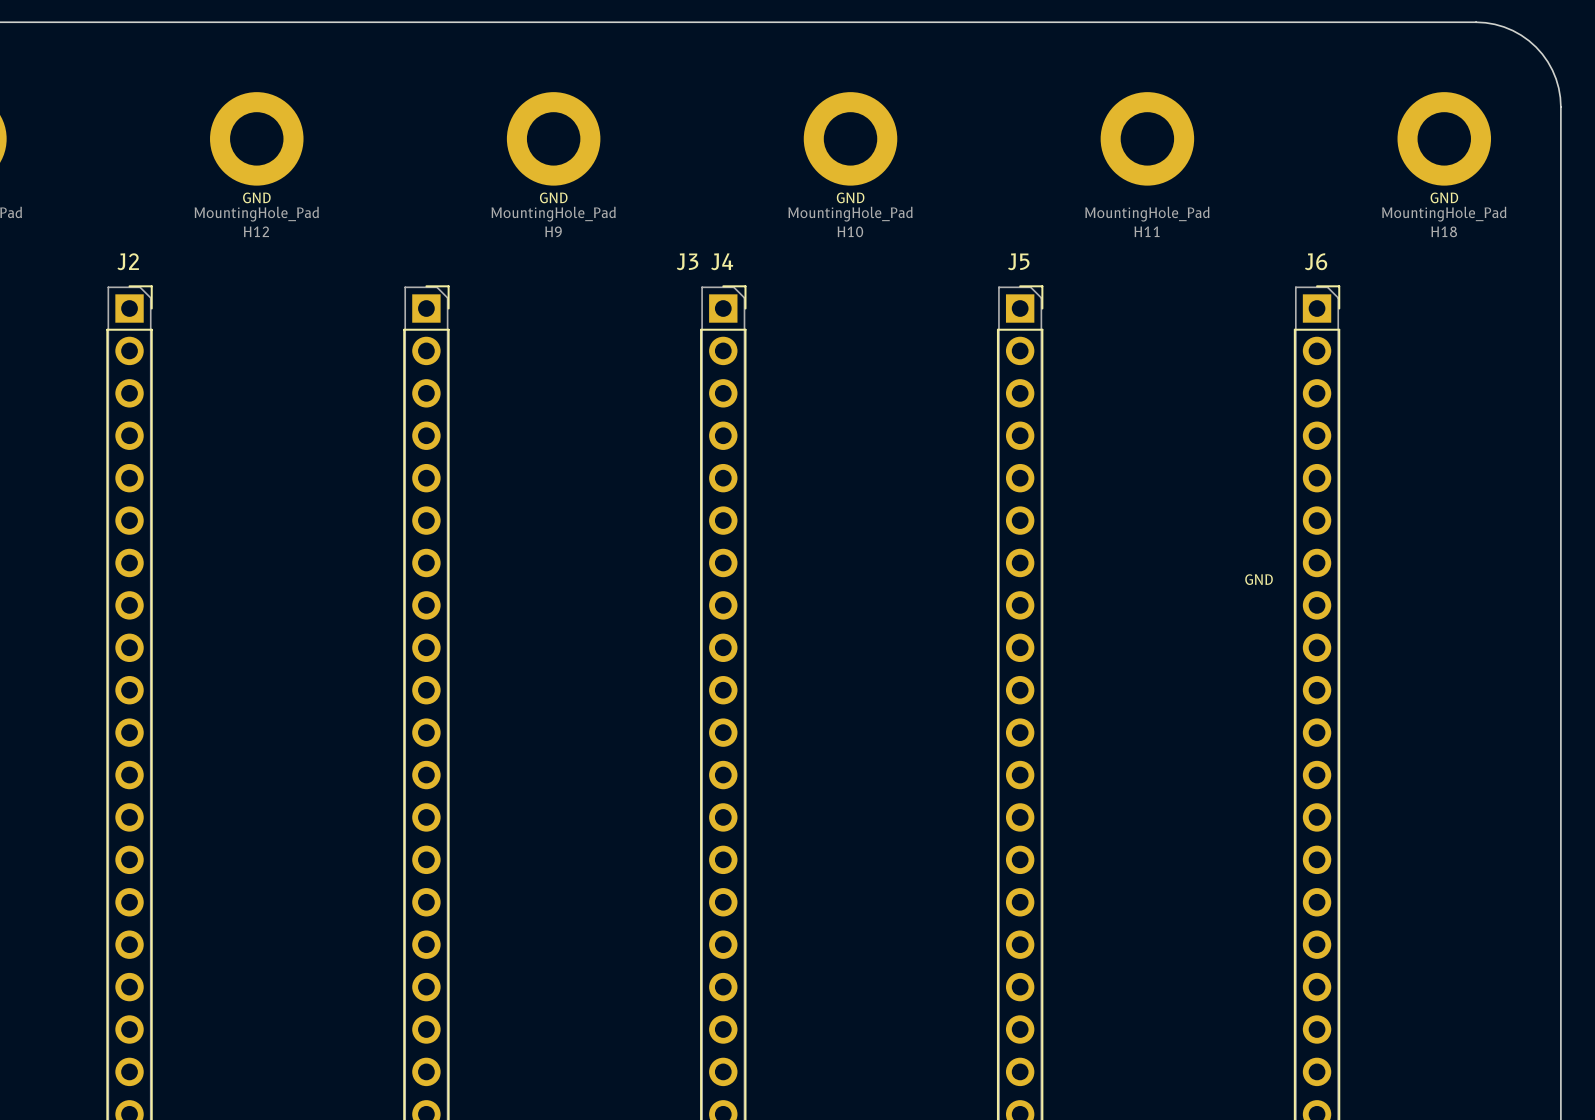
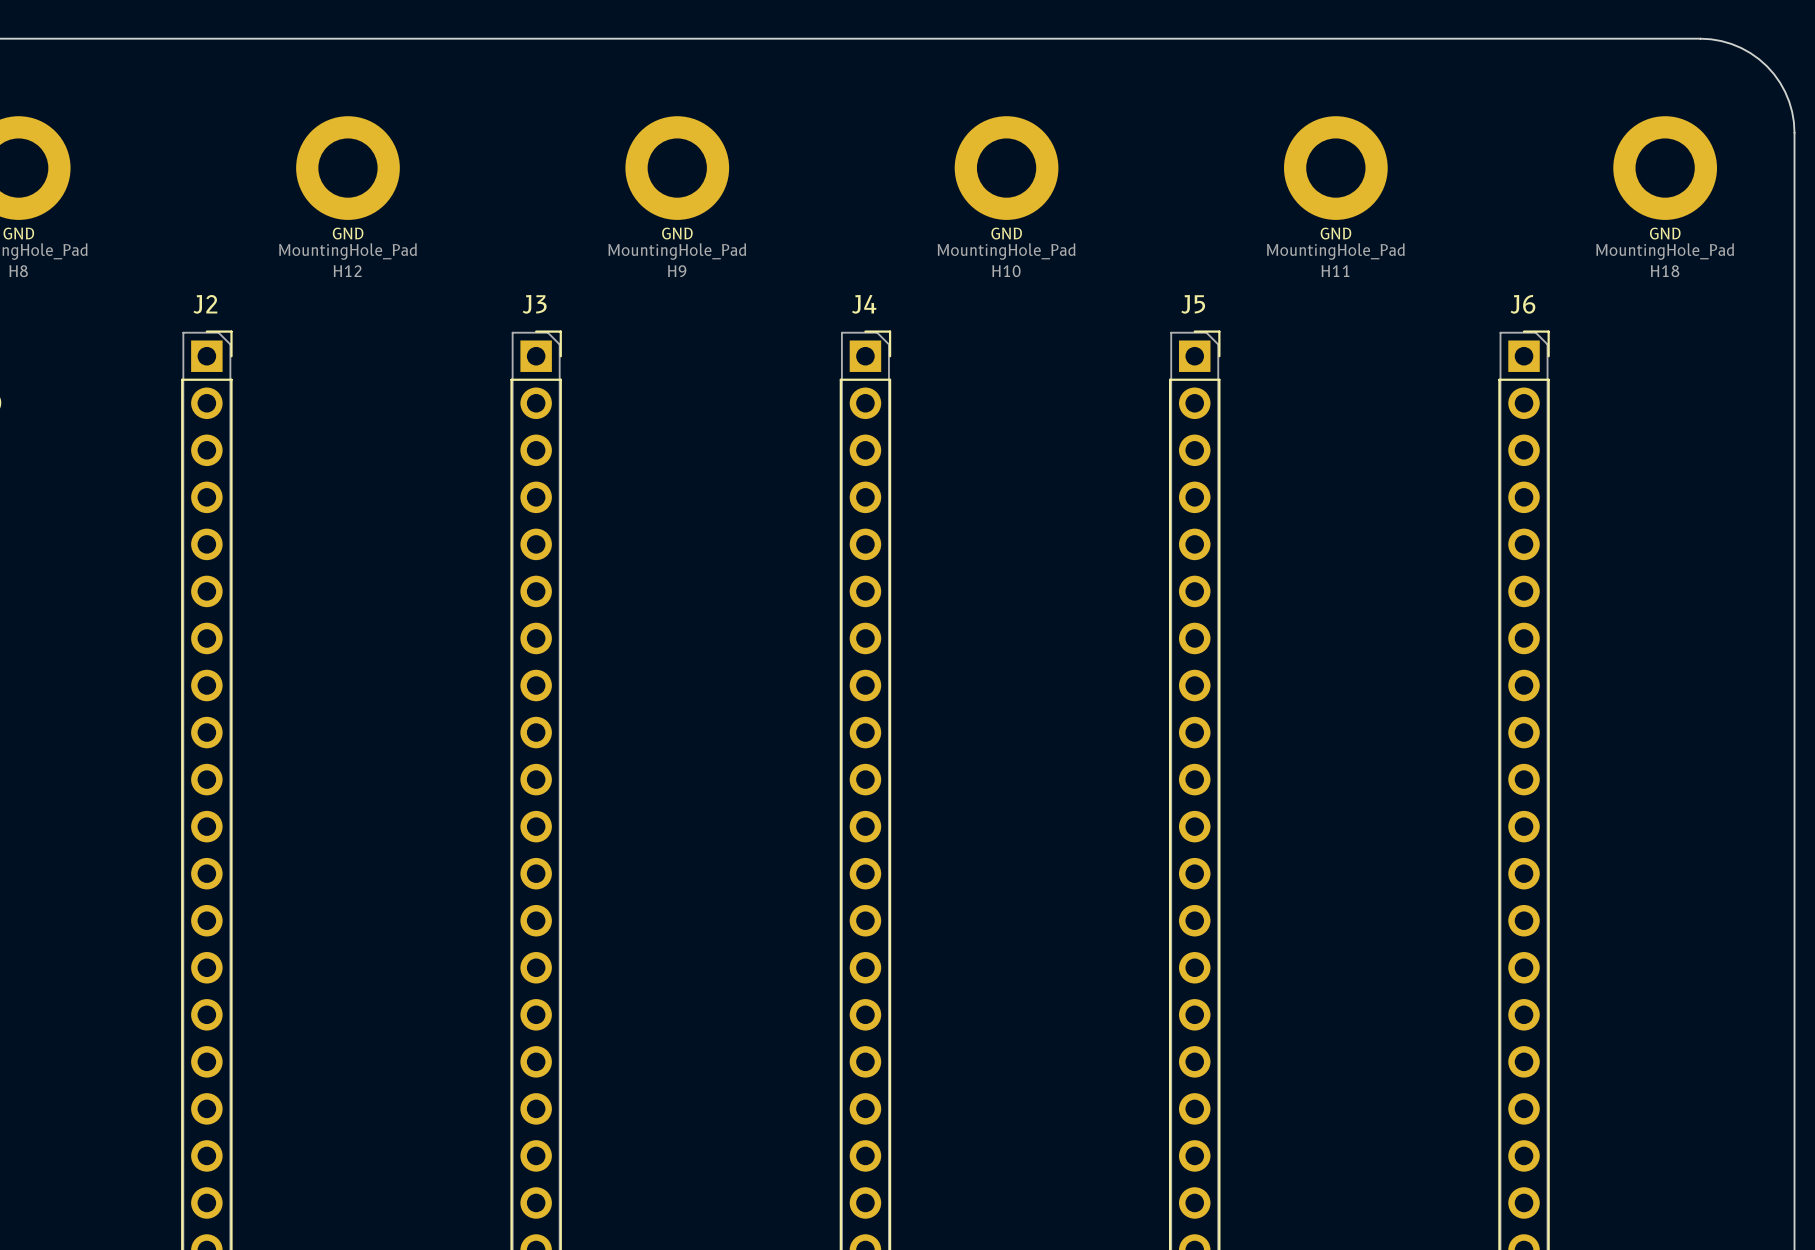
J3 name position: J3 (687, 261) -> J3 (534, 304)
H11 text position: GND (1259, 579) -> GND (1335, 233)

